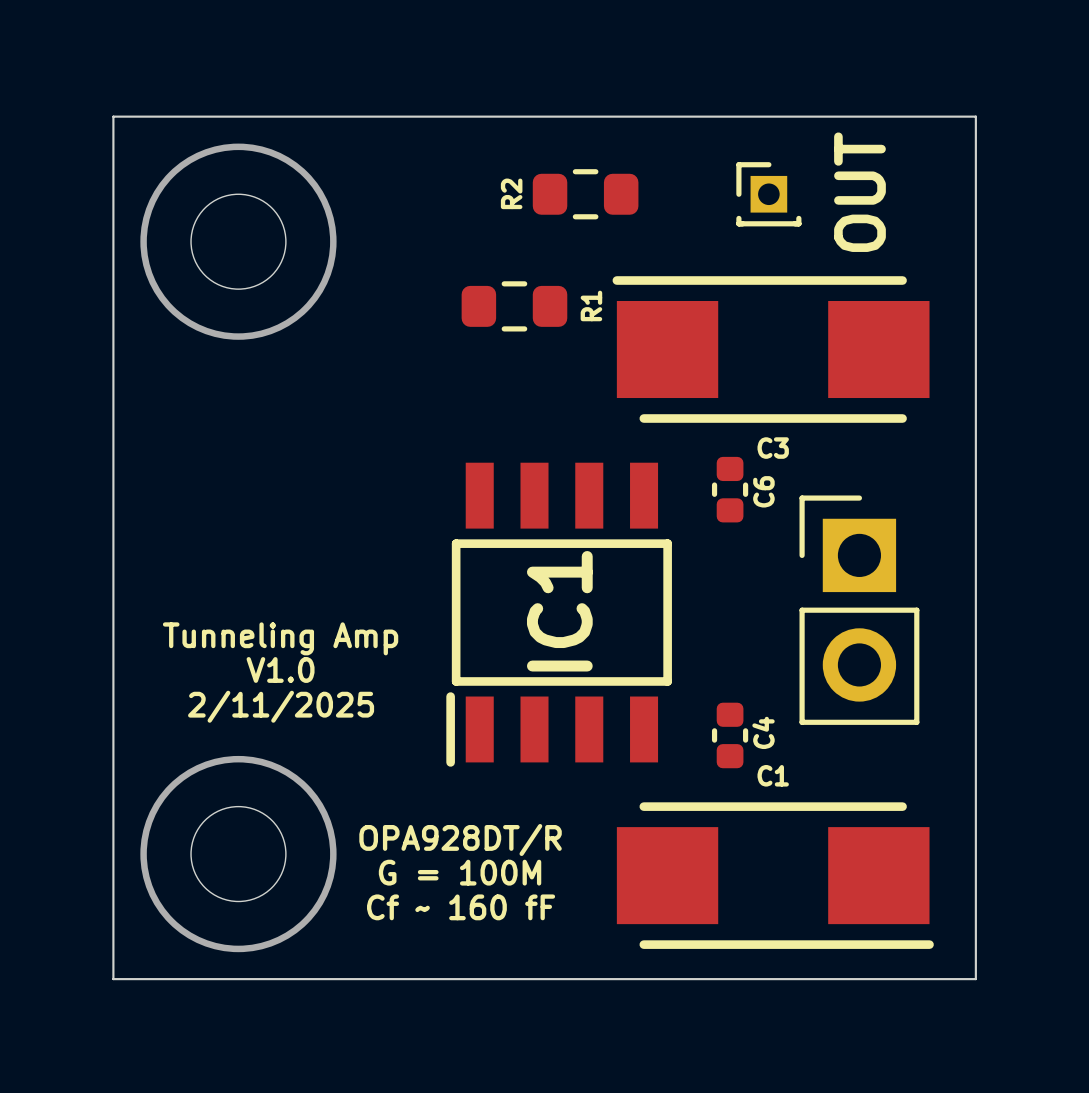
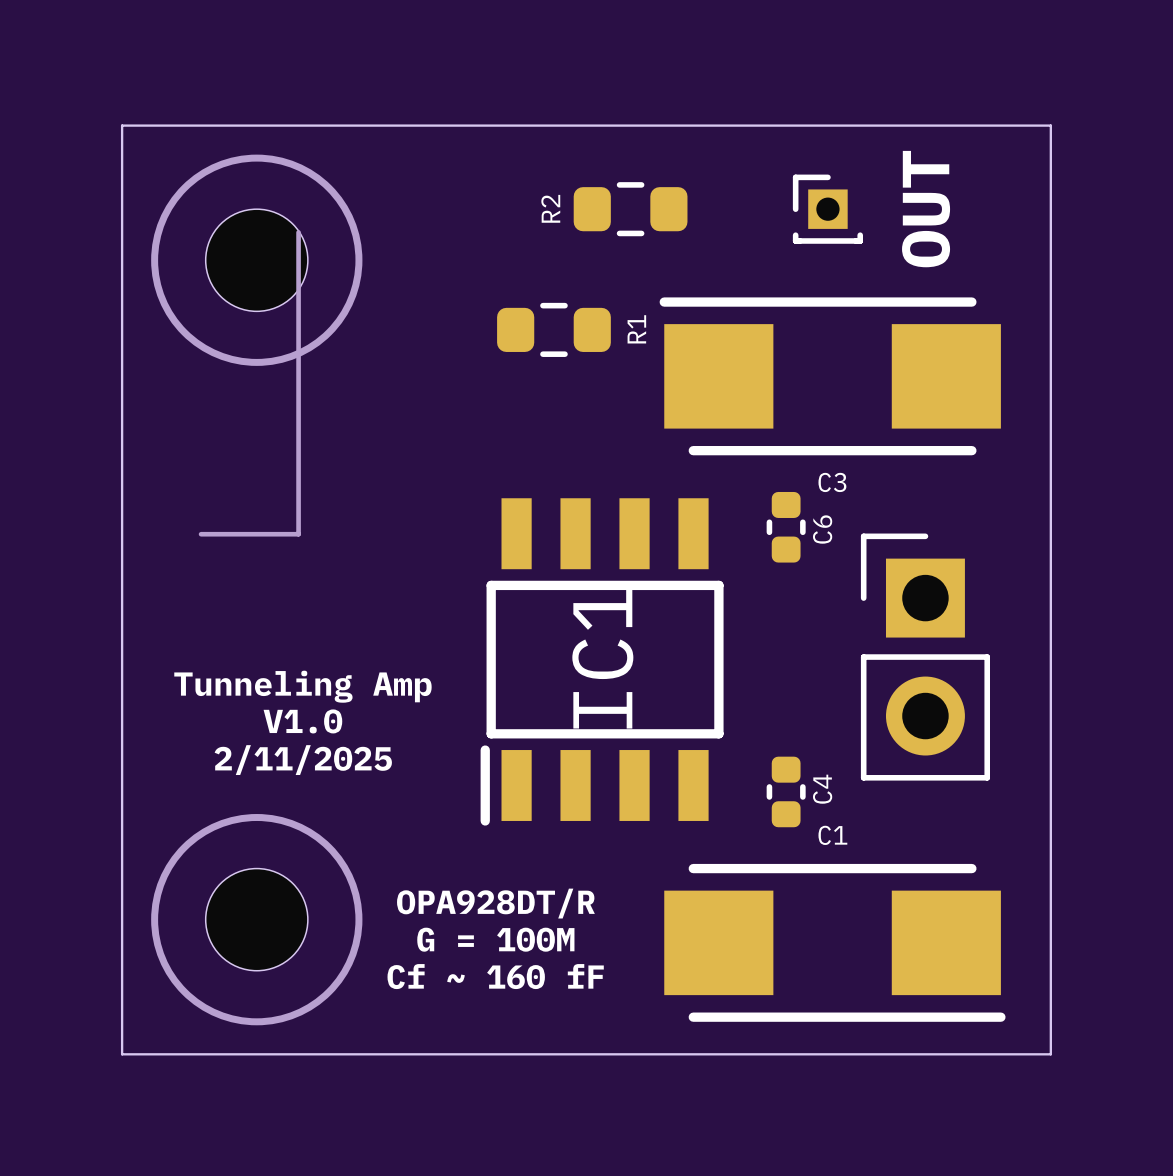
line: none -> (298, 232) (298, 534) (201, 534)

